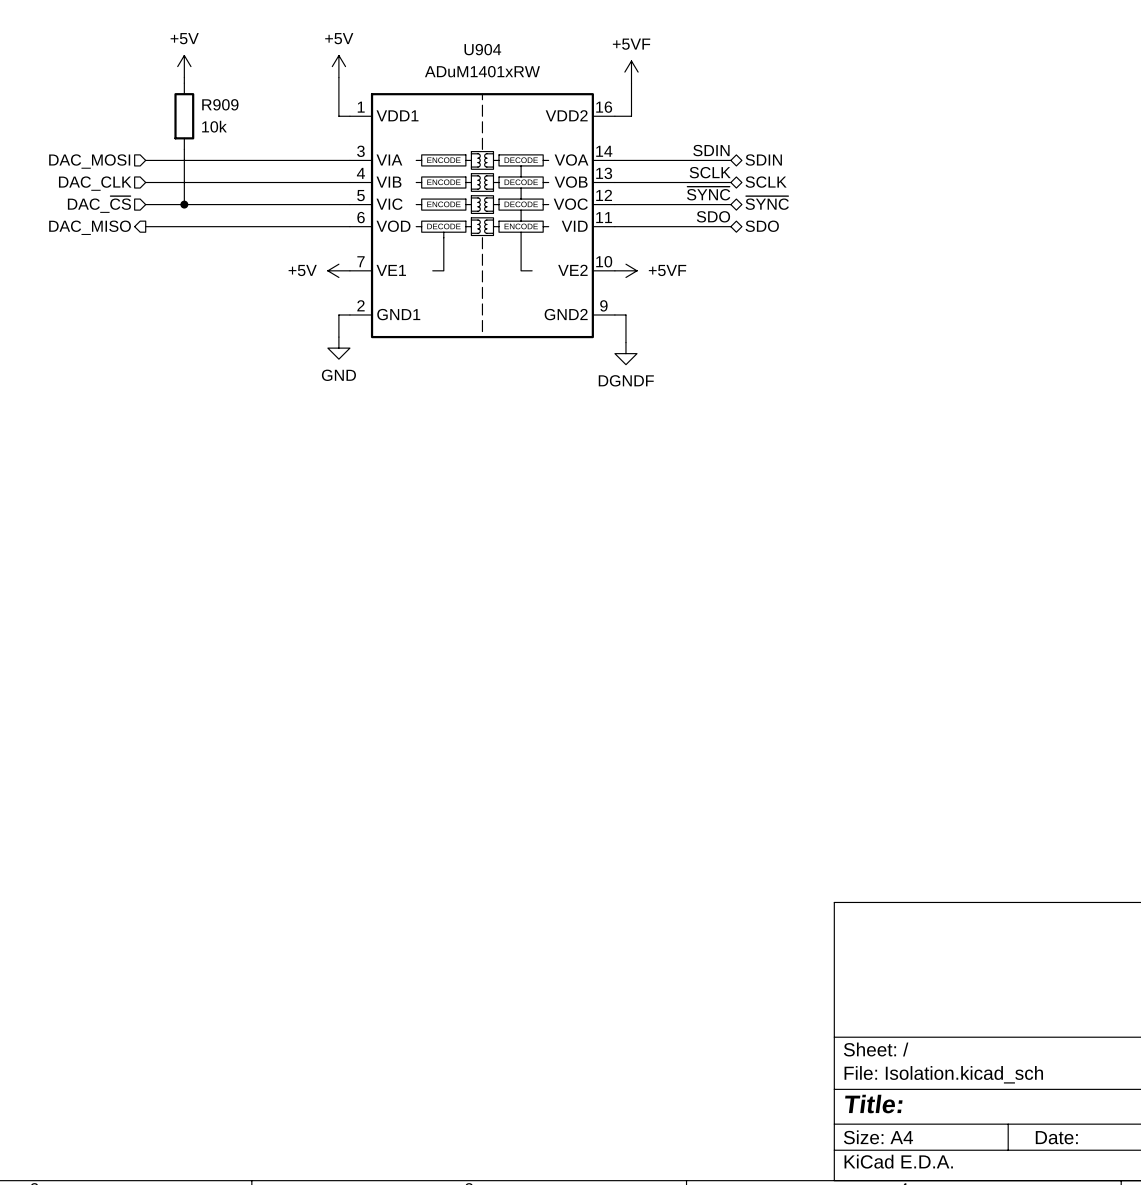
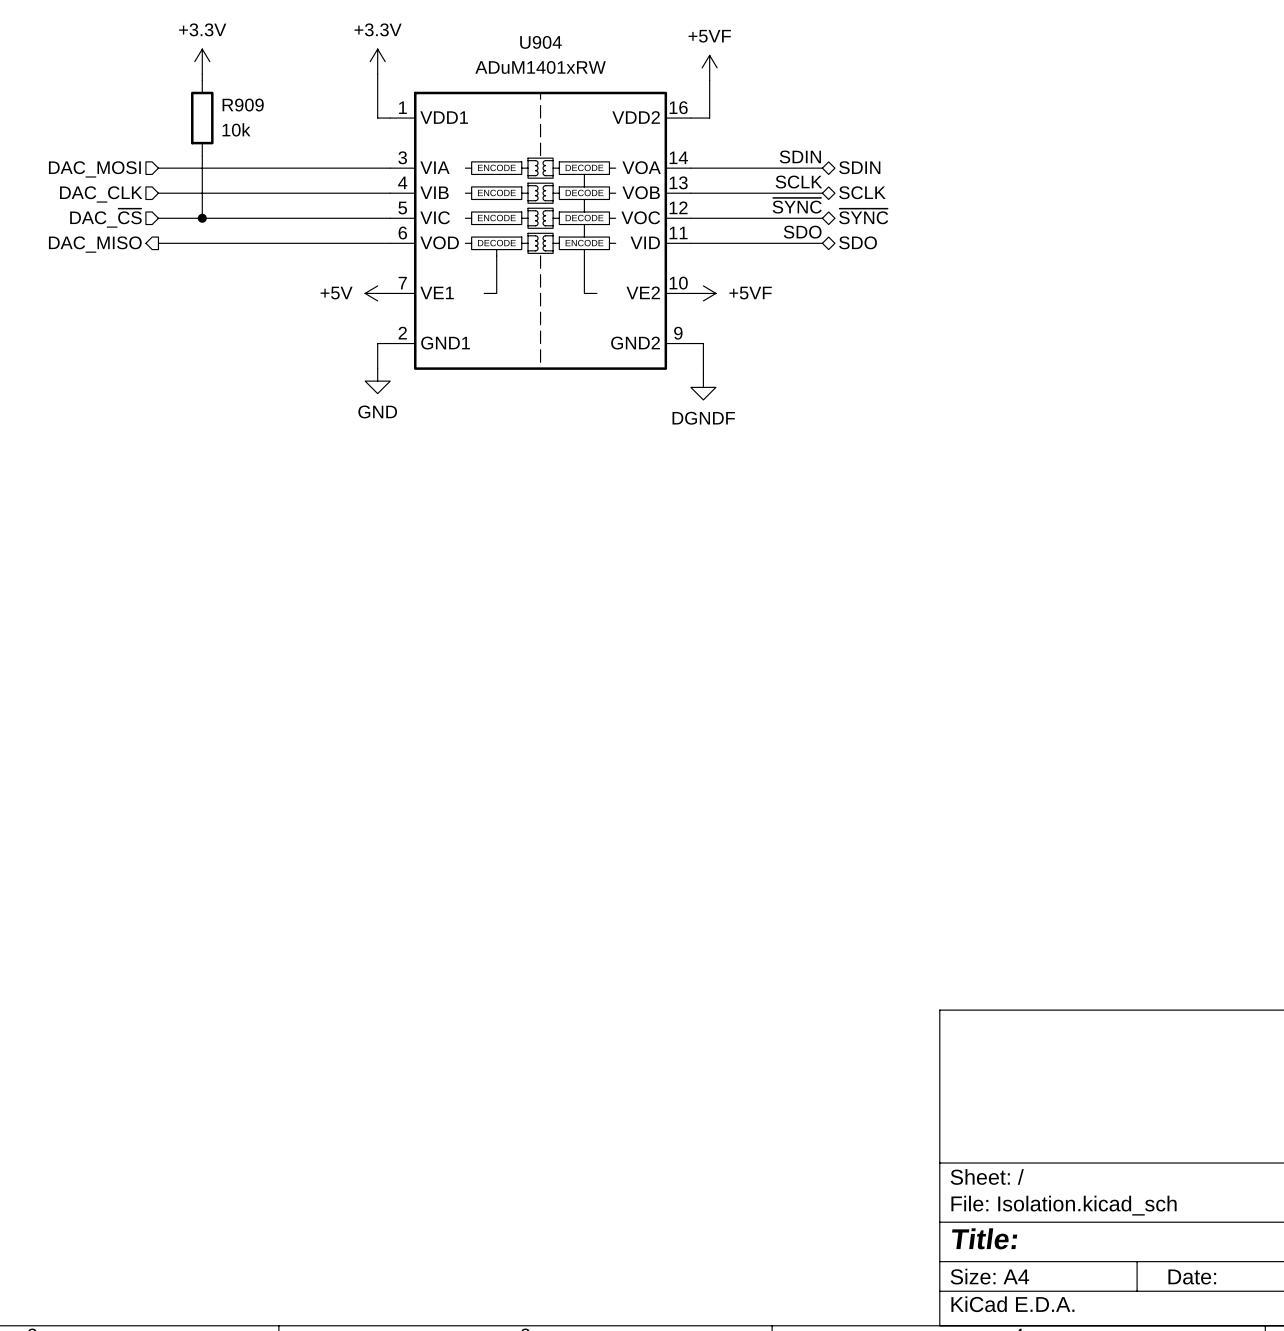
power symbol: +5V (184, 66) -> +3.3V (202, 61)
power symbol: +5V (338, 66) -> +3.3V (377, 61)

